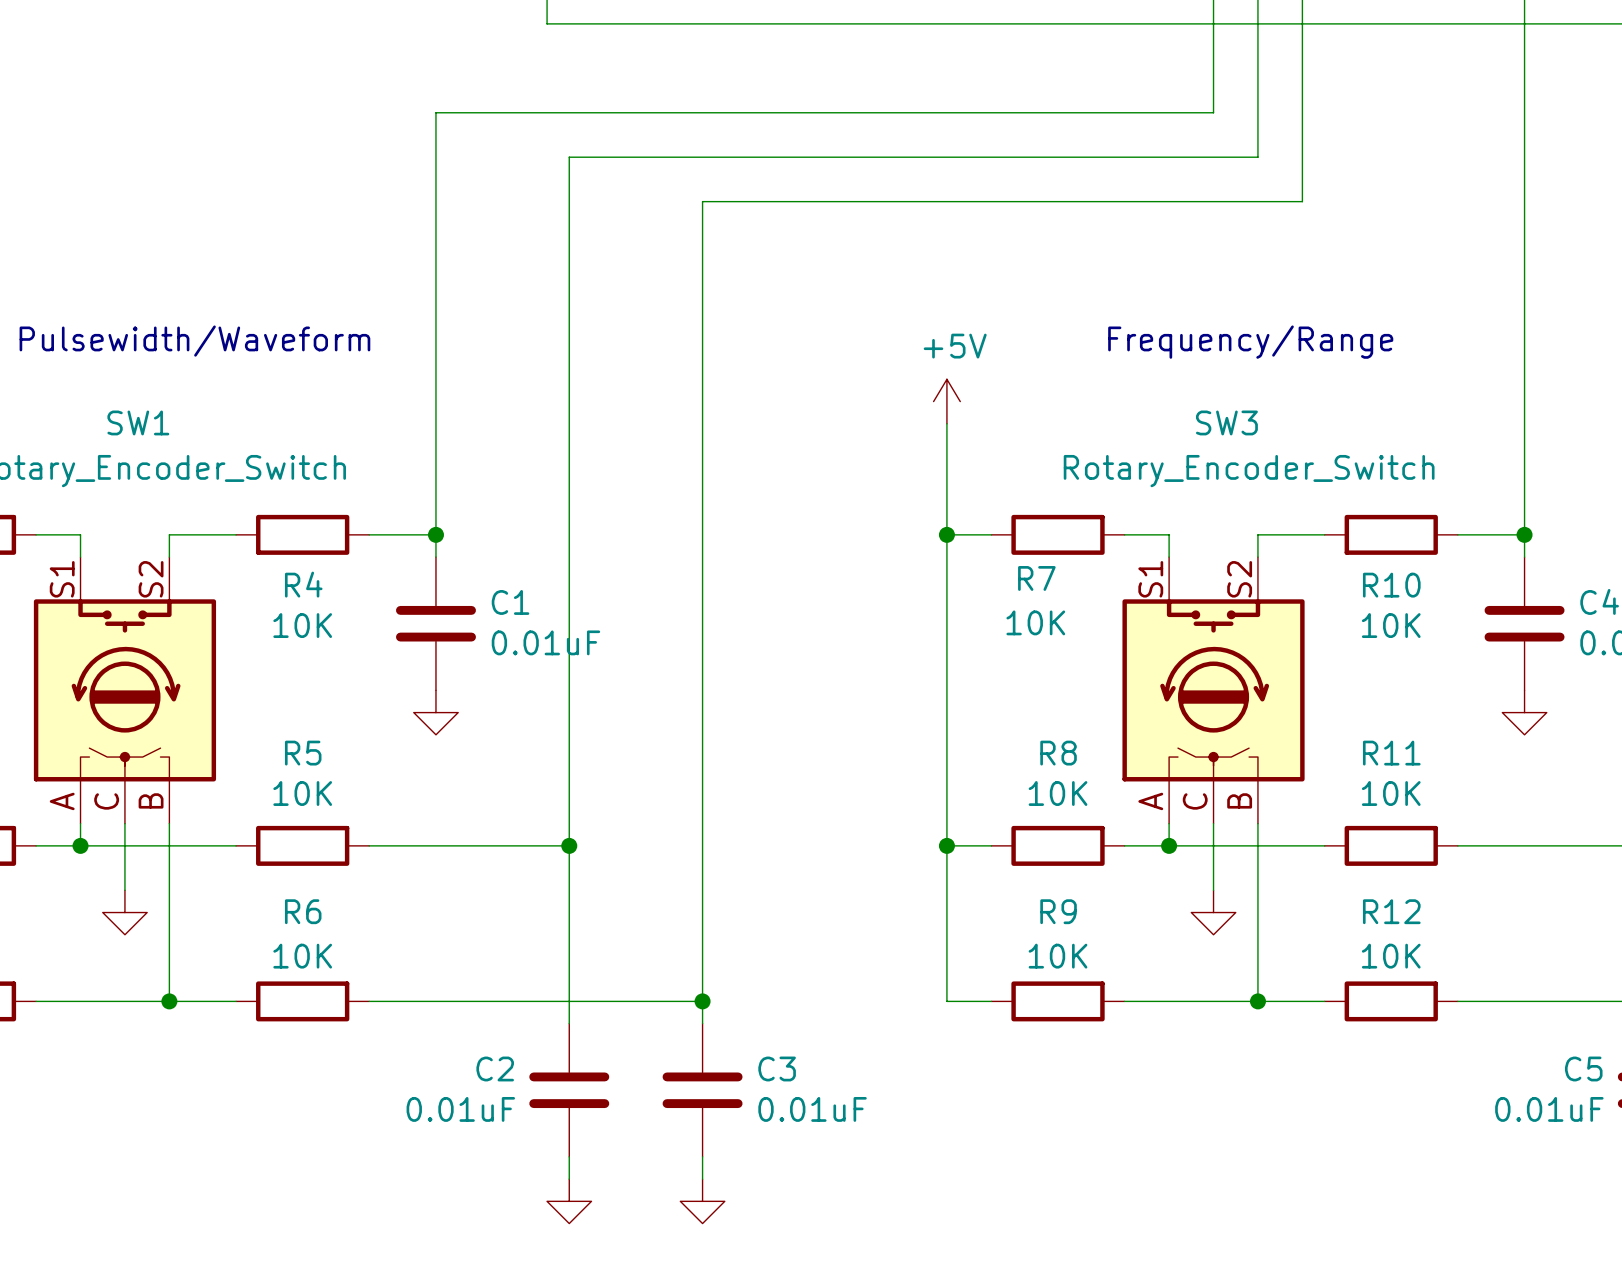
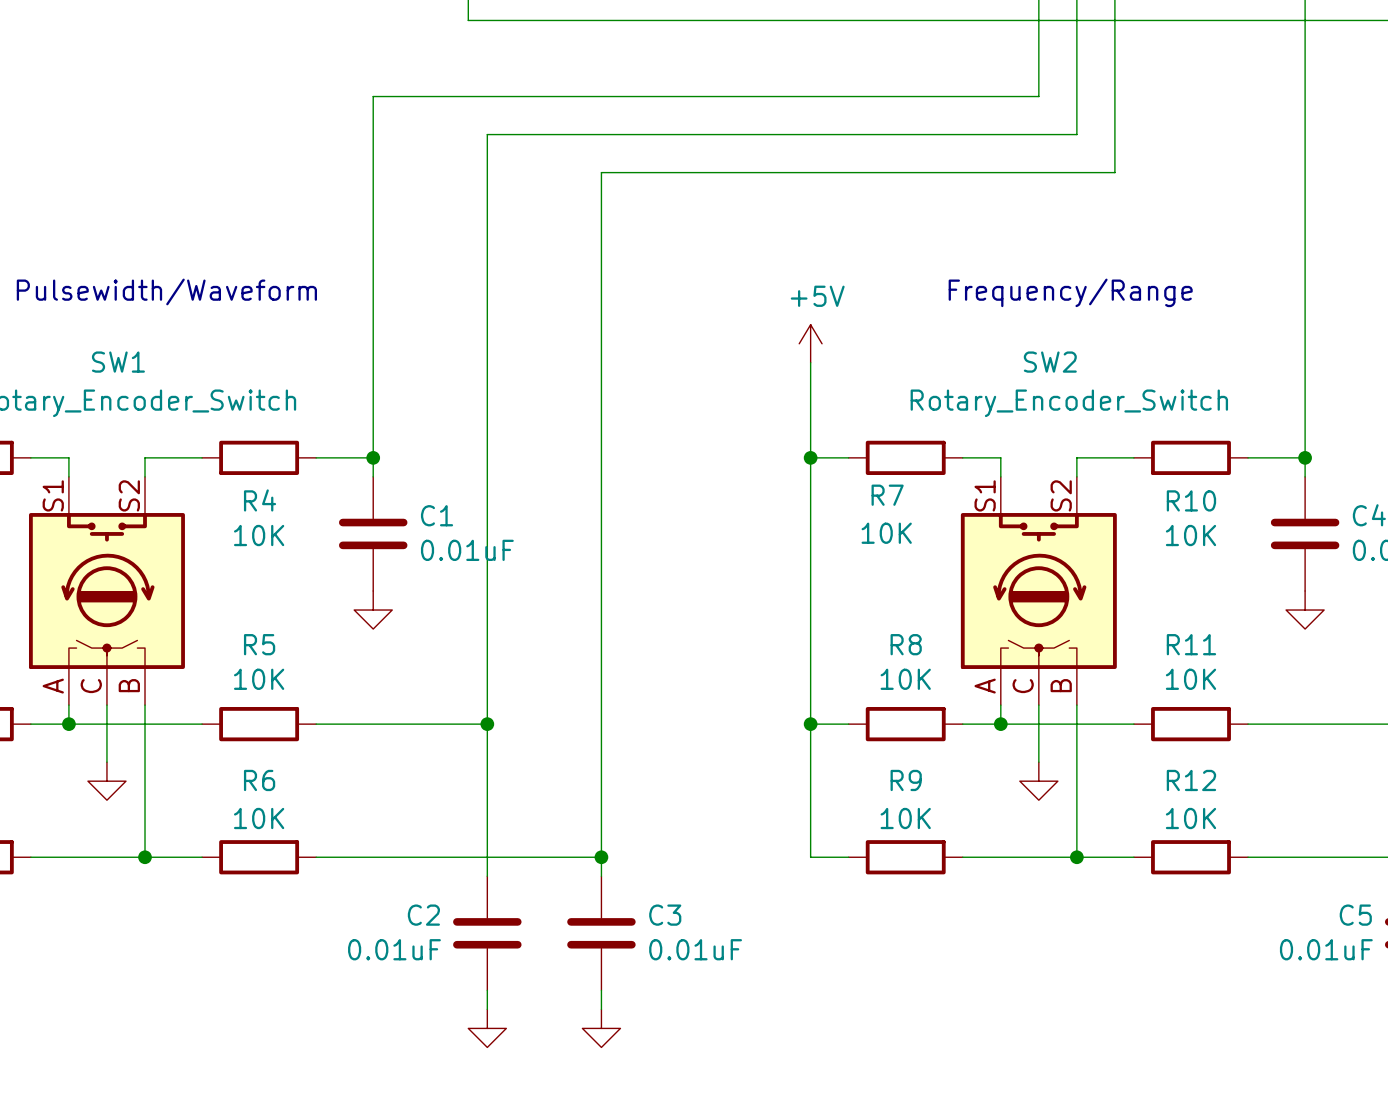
SW3 name: SW3 (1226, 422) -> SW2 (1050, 362)

